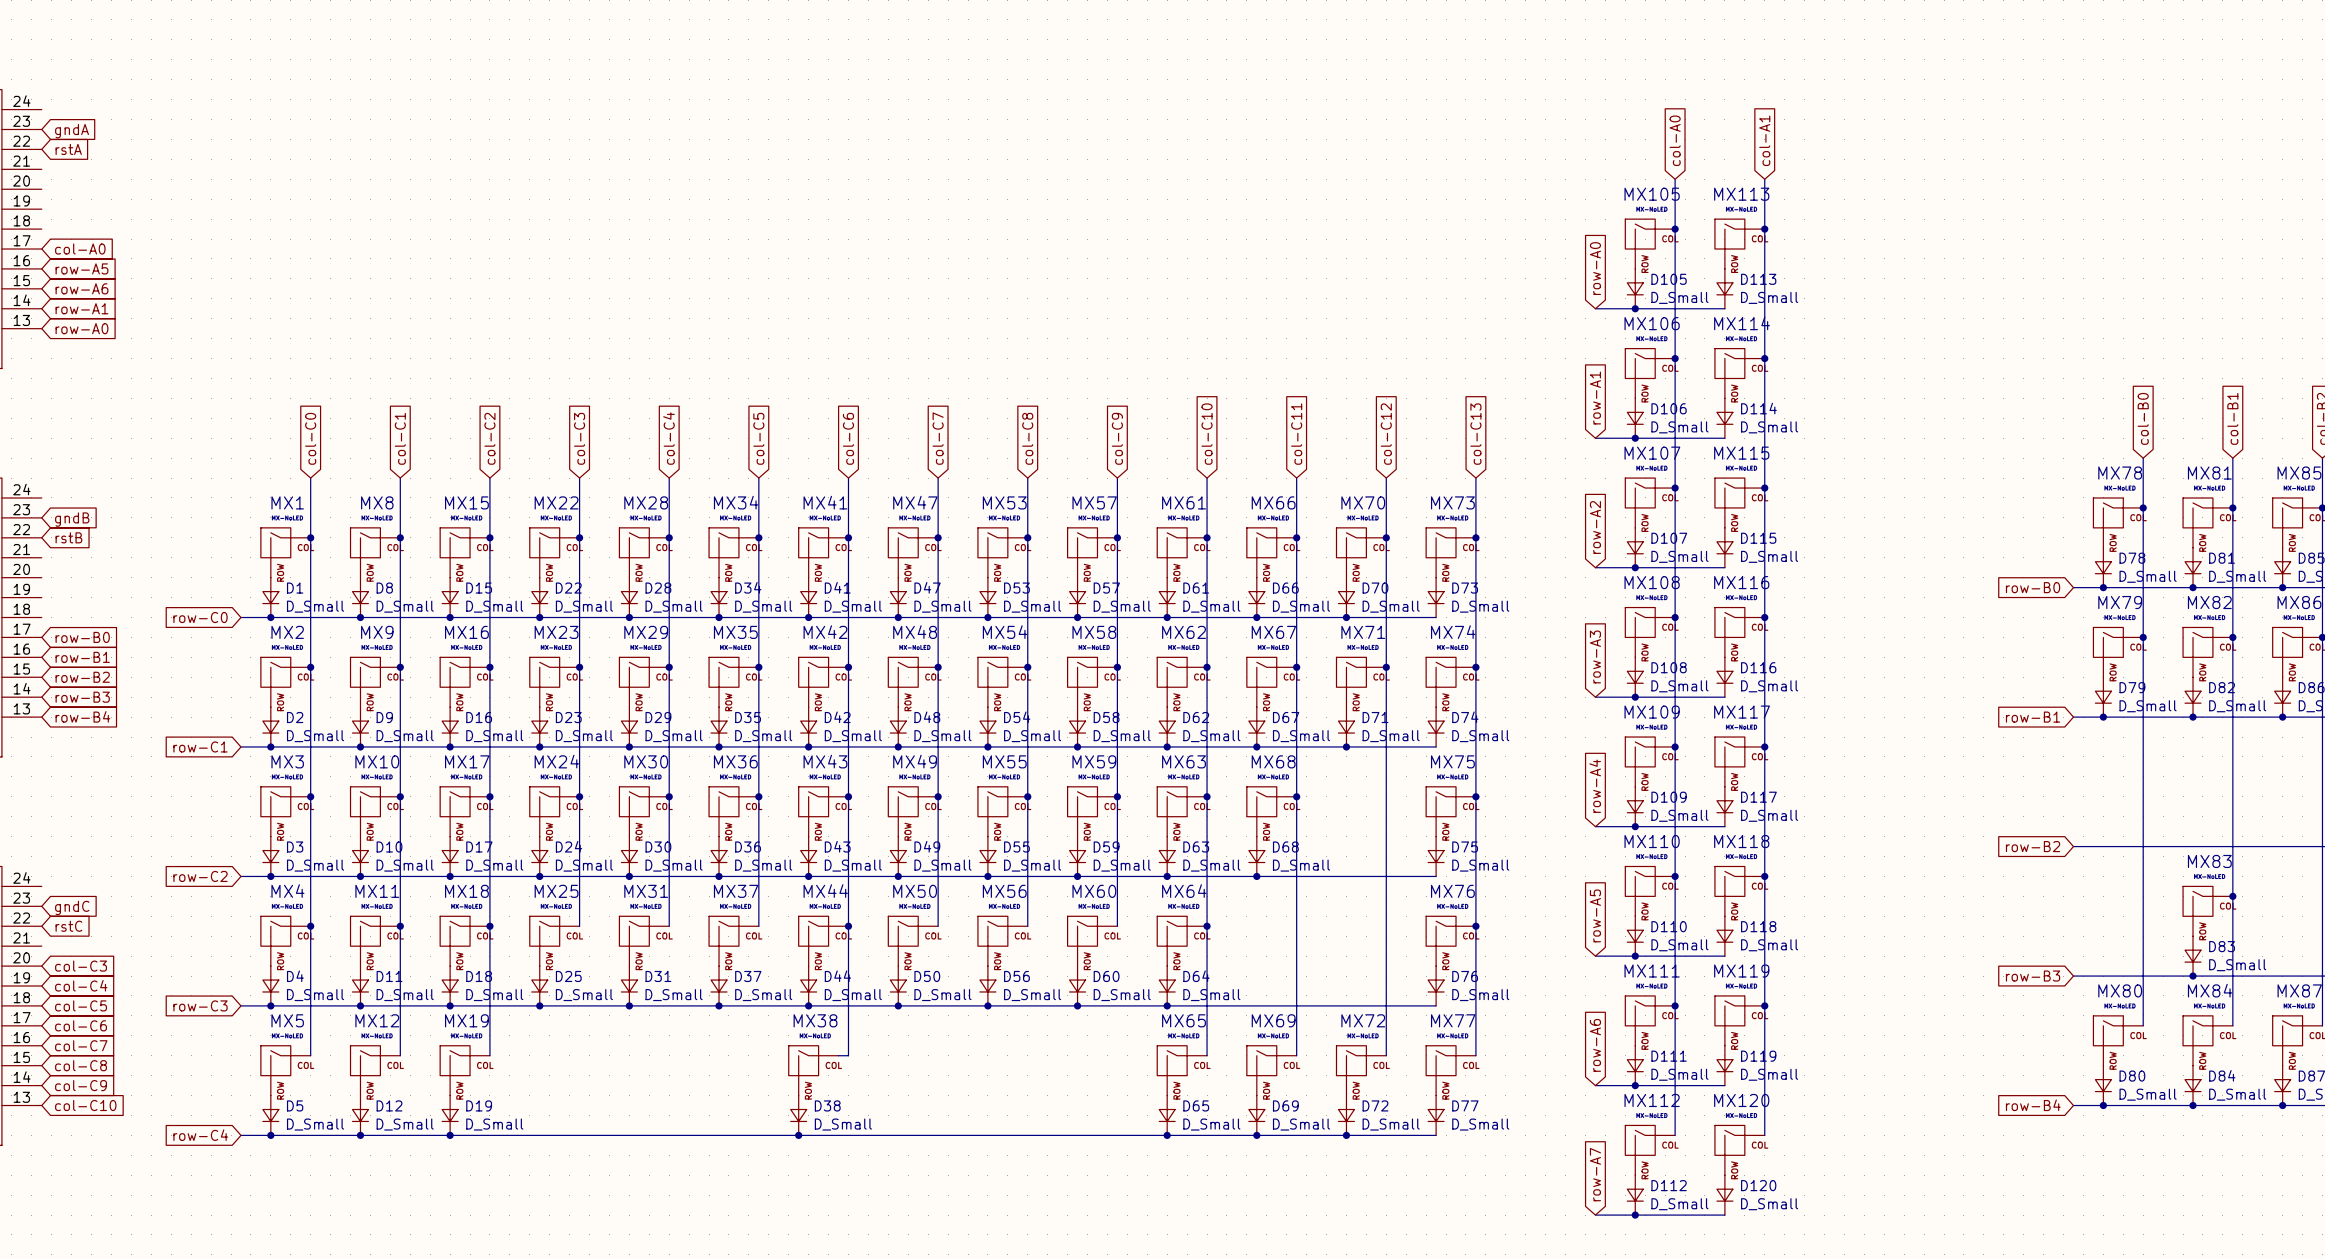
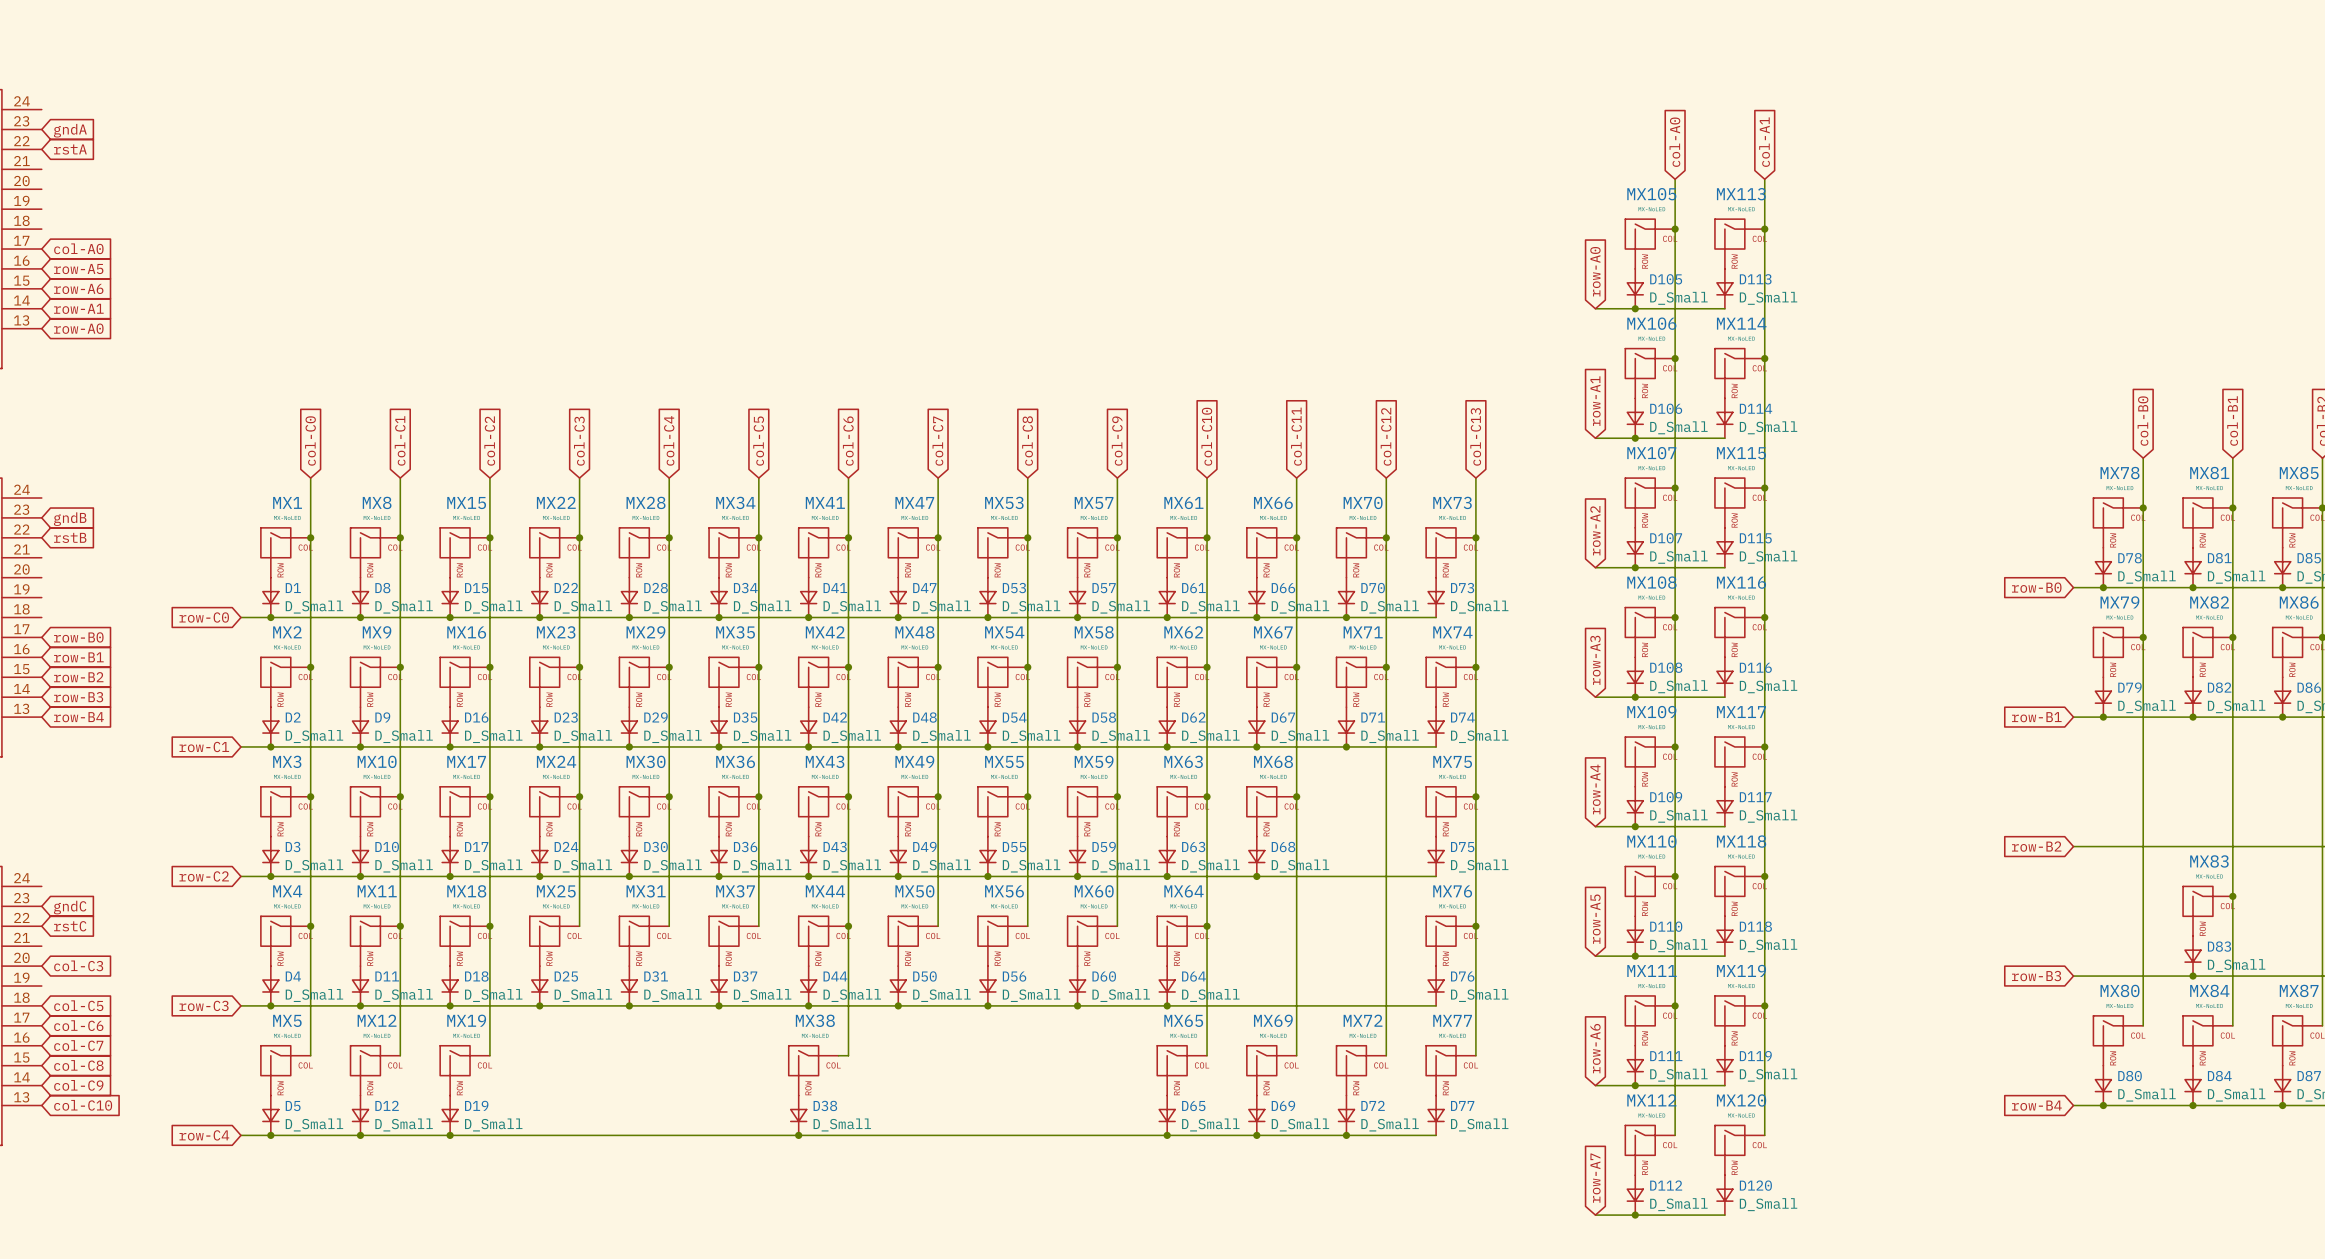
global label: col-C4 (81, 985) -> none

